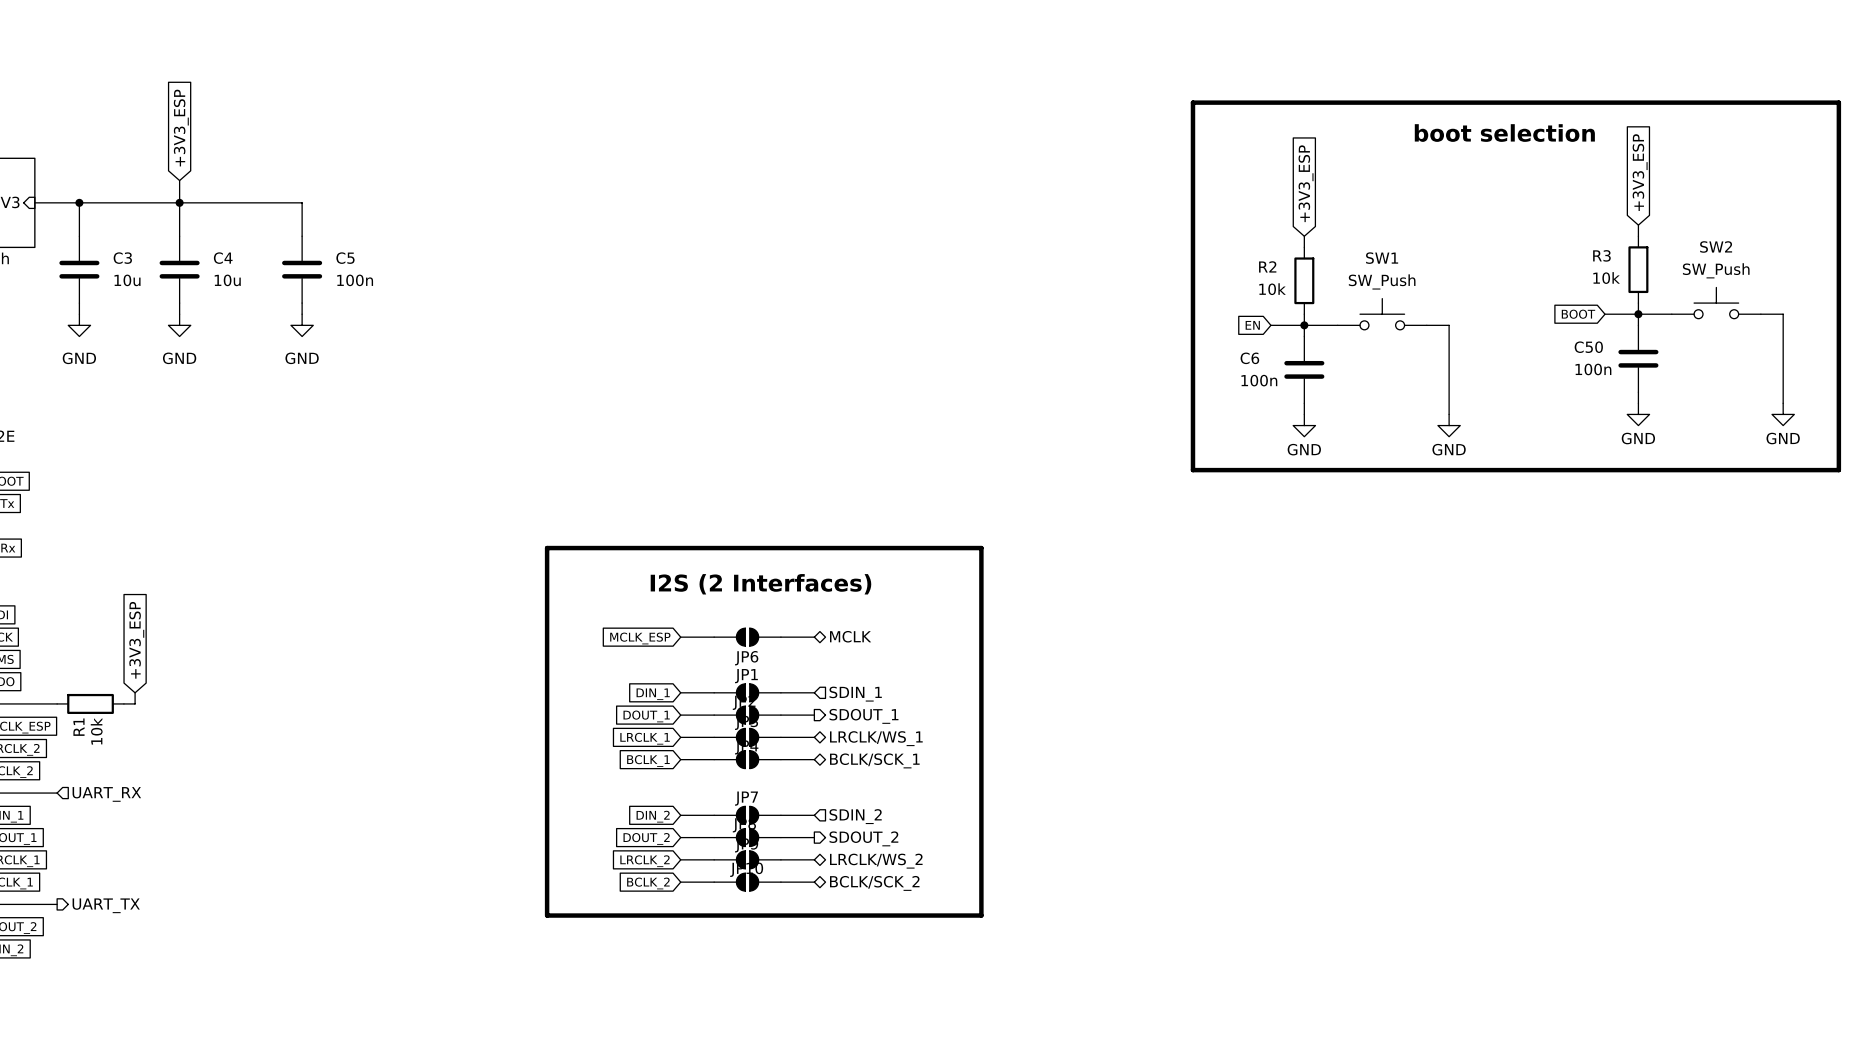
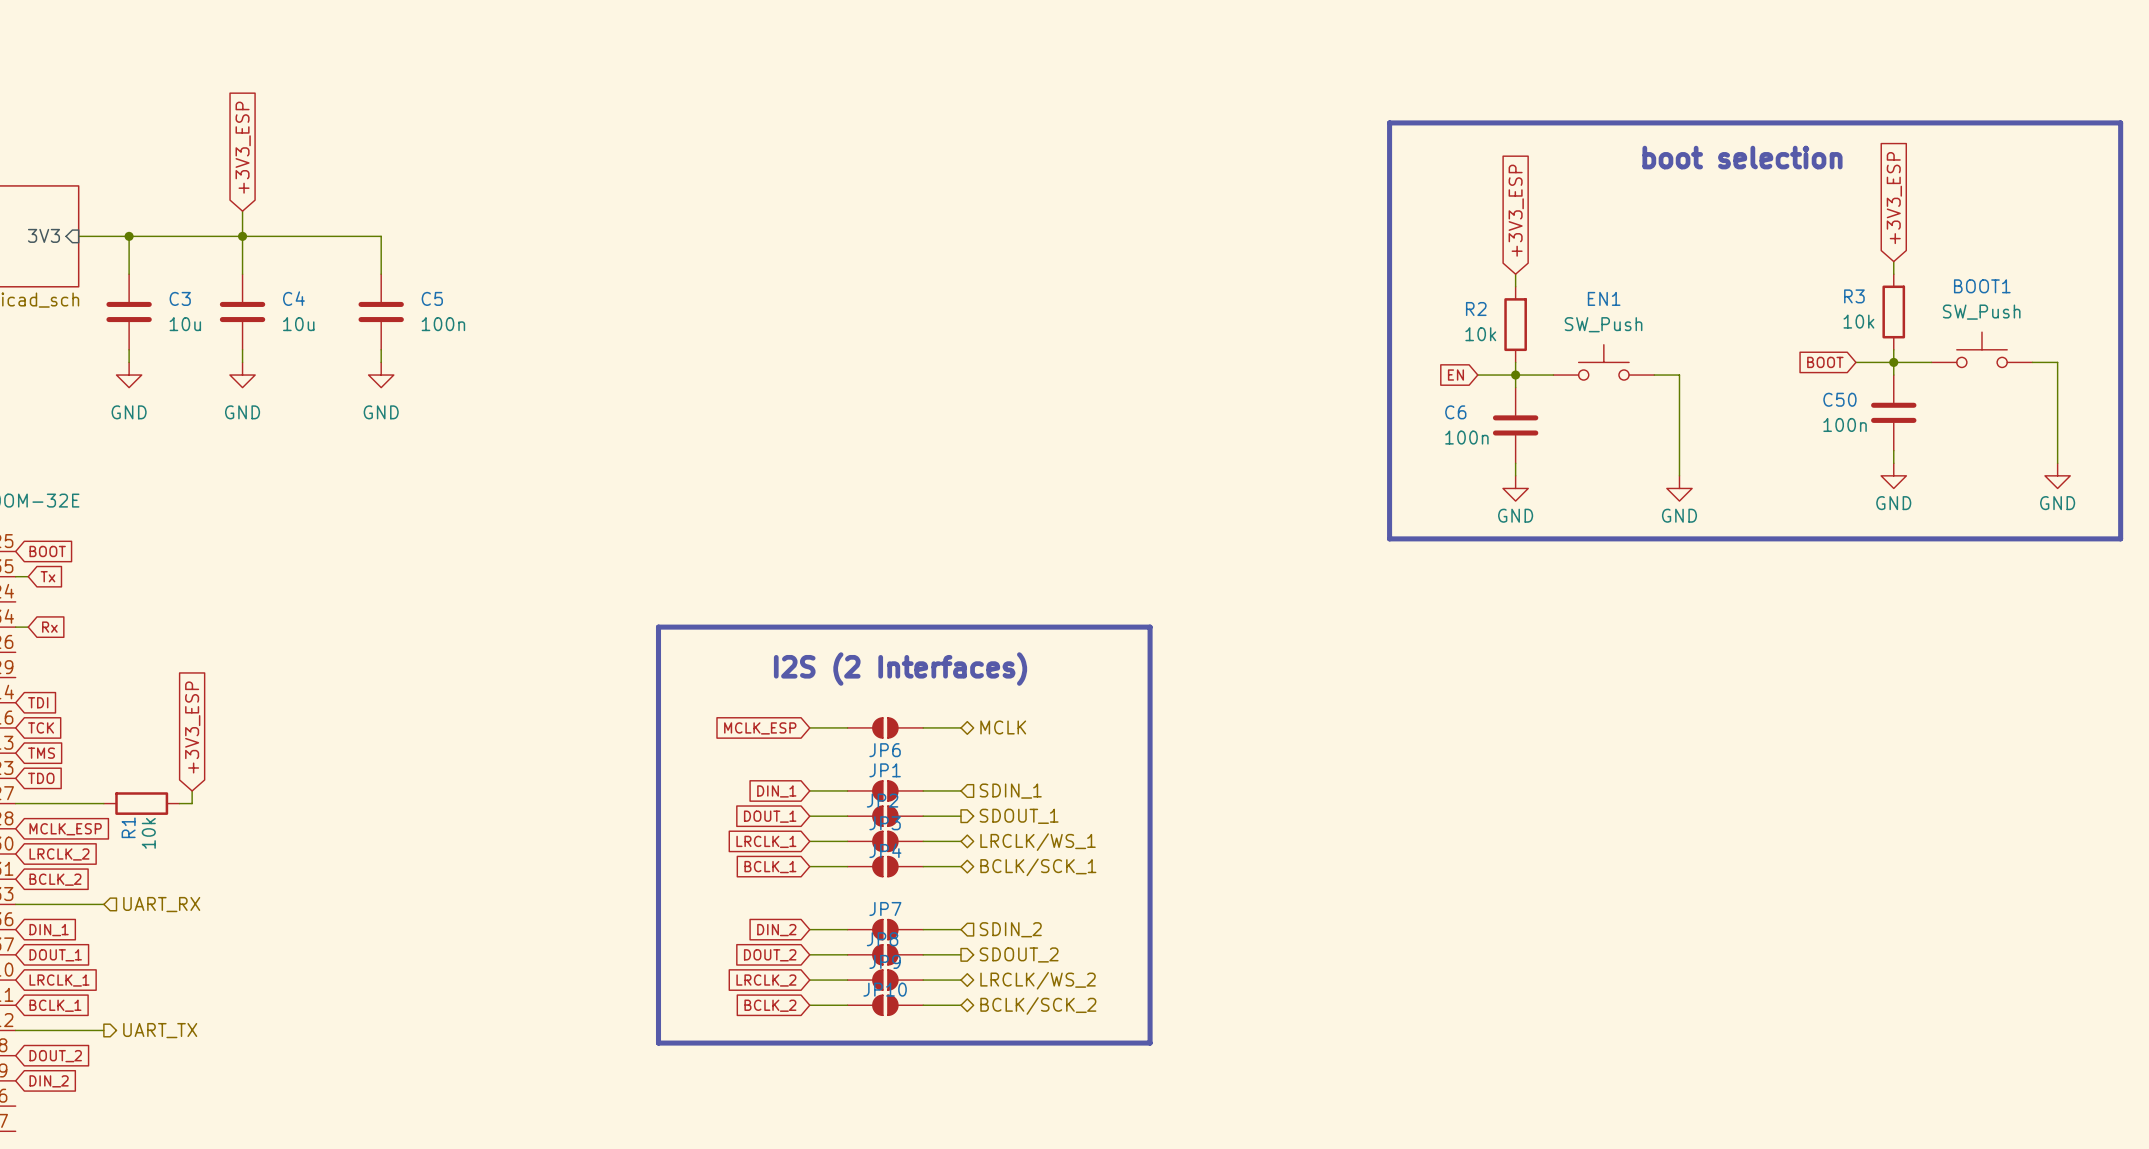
SW2 name: SW2 (1716, 246) -> BOOT1 (1982, 286)
SW1 name: SW1 (1382, 258) -> EN1 (1604, 298)

